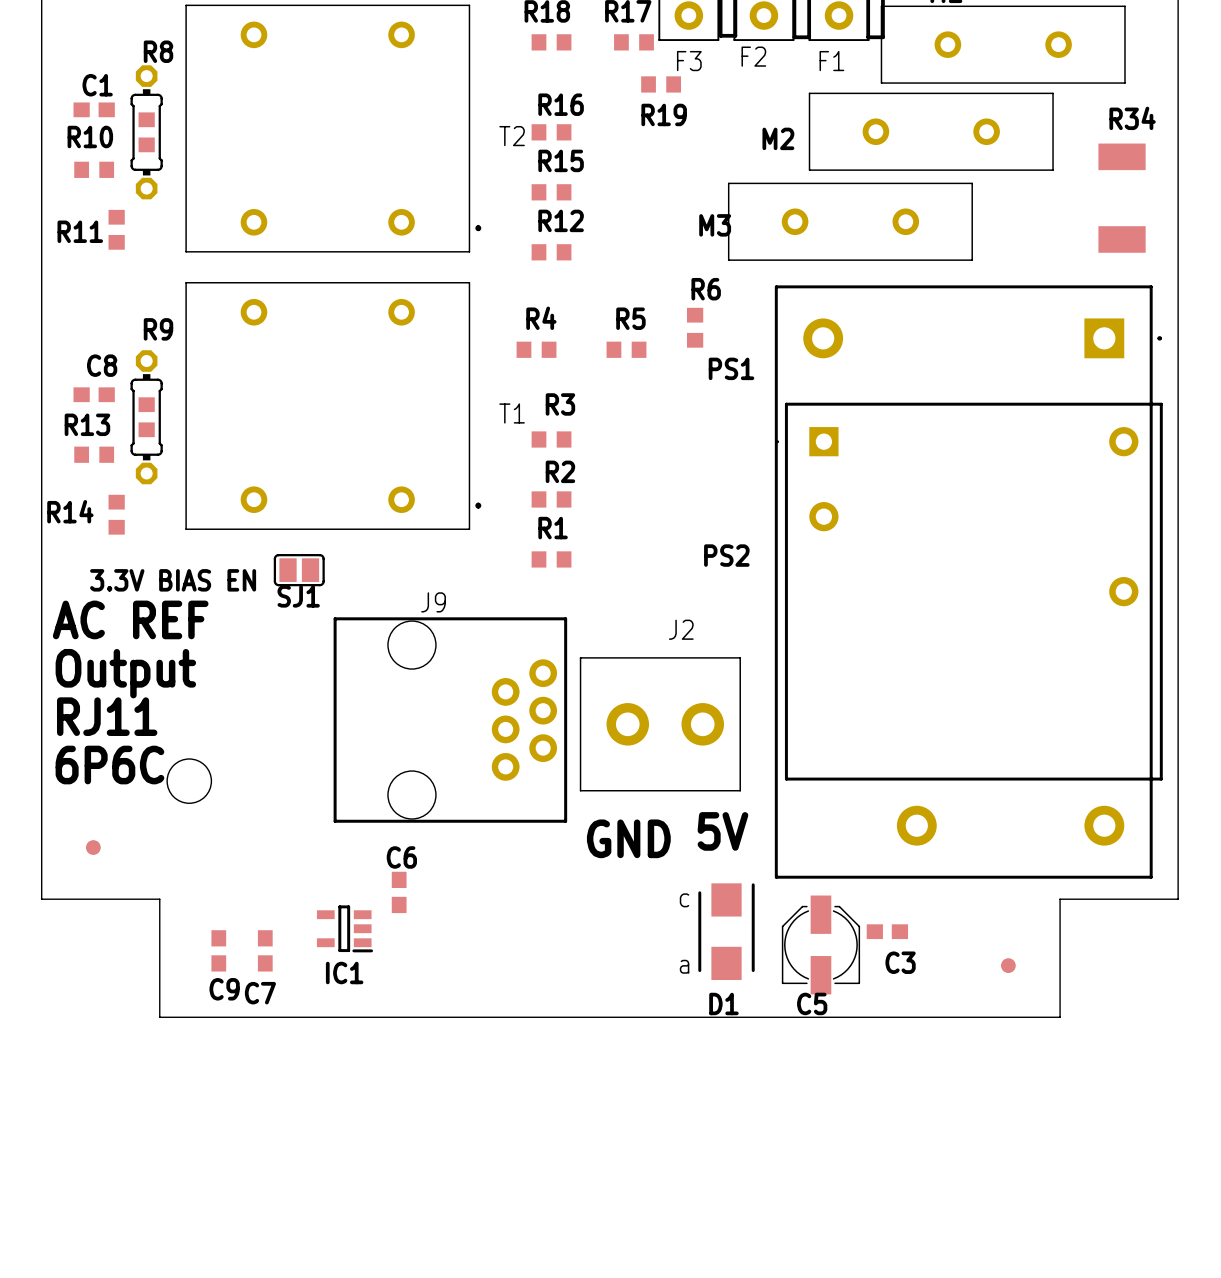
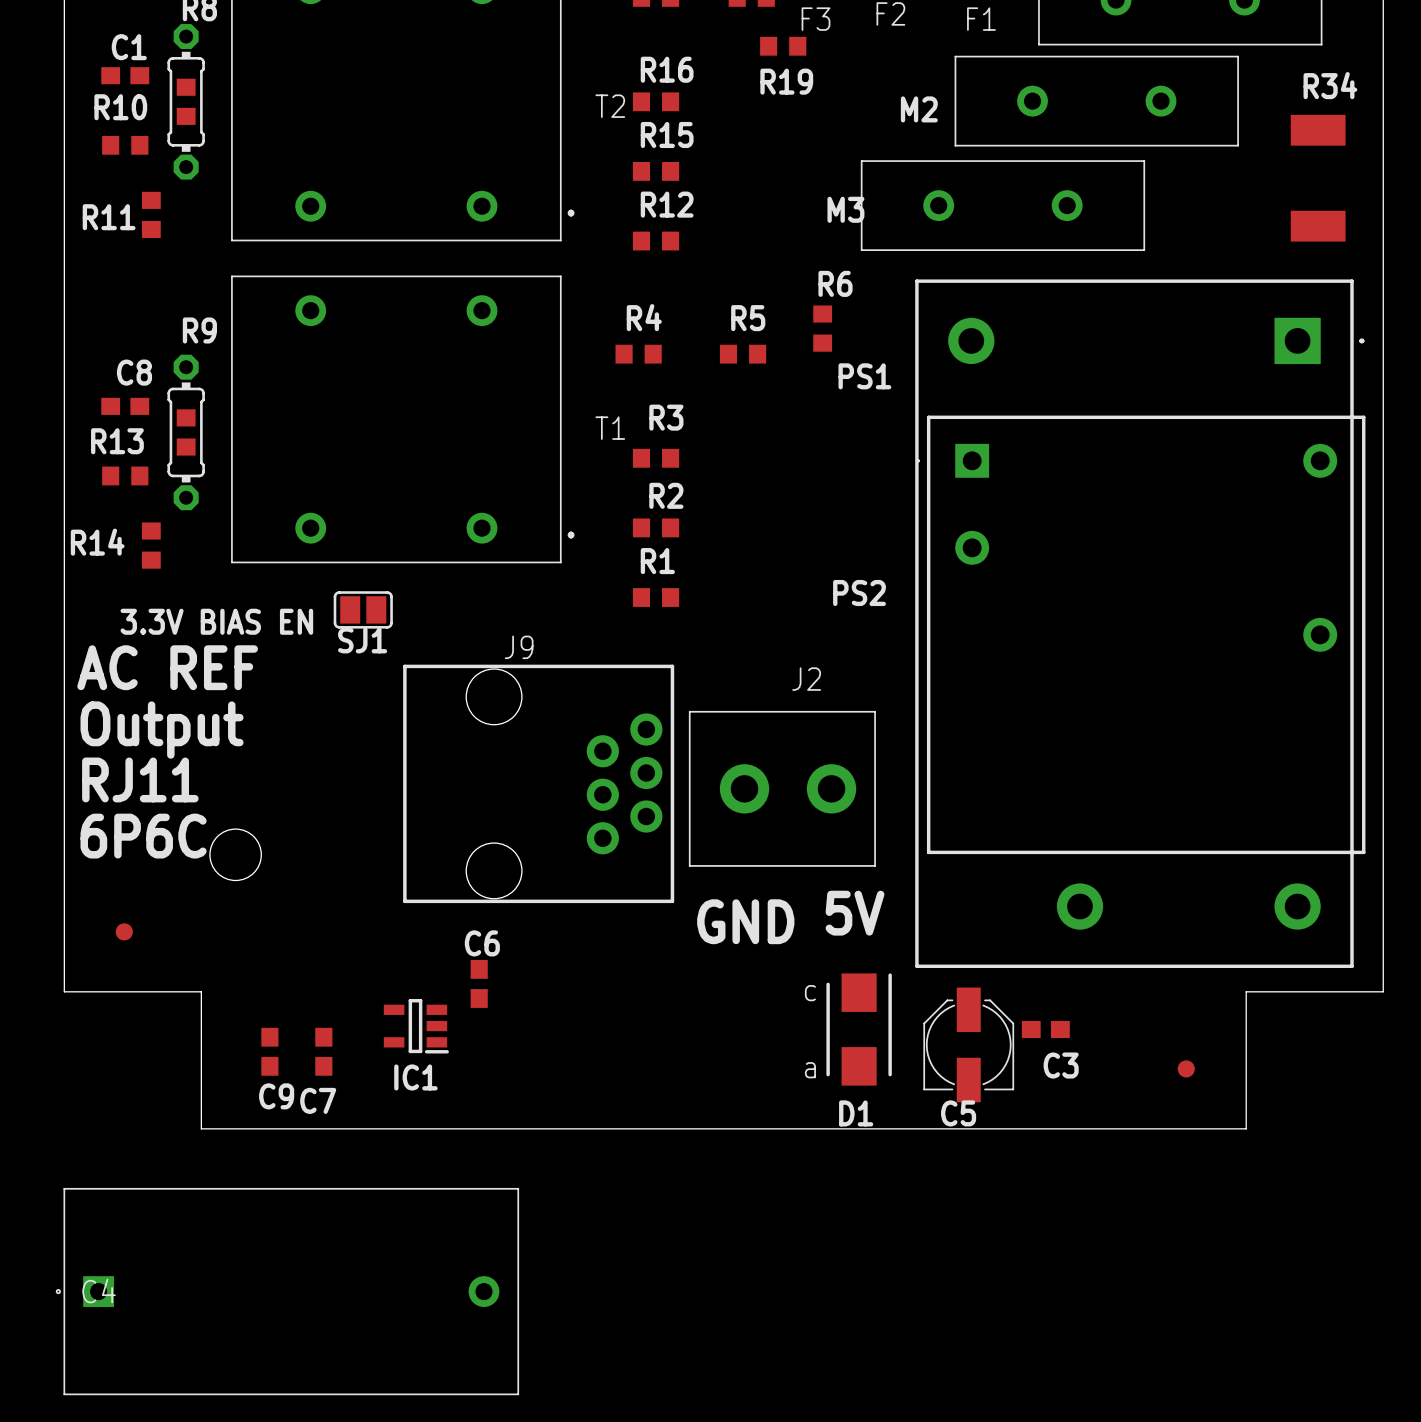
C4: none -> (287, 1291)

